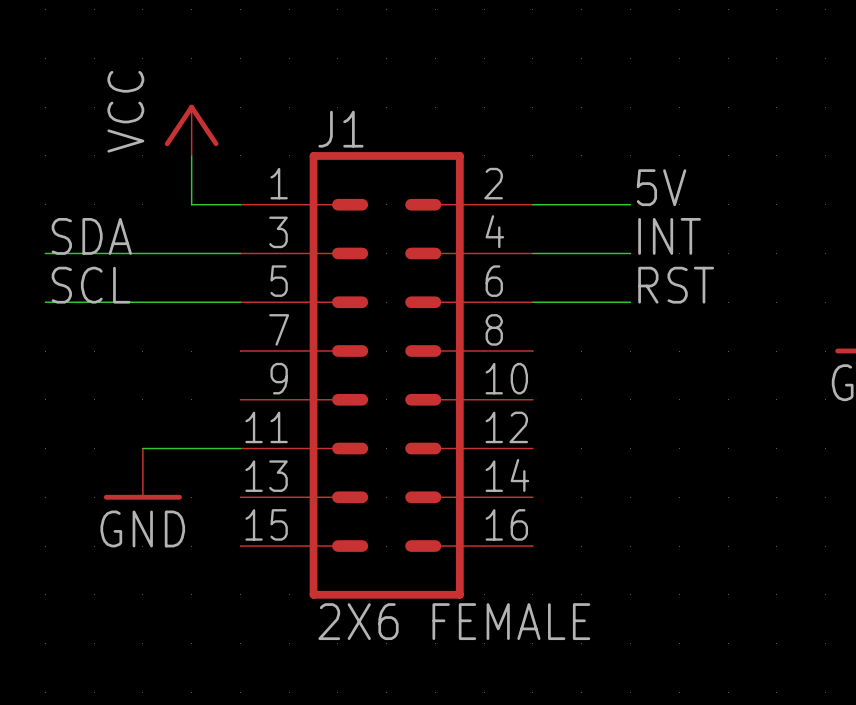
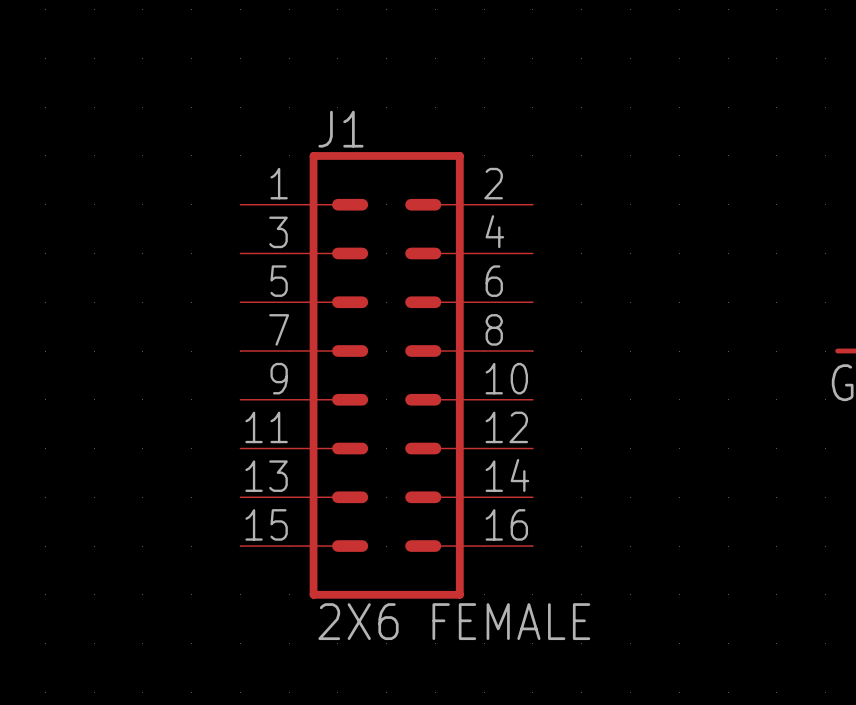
power symbol: VCC (191, 130) -> none
wire: (191, 155) (191, 204) (240, 204) -> none
label: 5V (661, 187) -> none
wire: (532, 204) (630, 204) -> none
label: SDA (91, 236) -> none
label: INT (669, 236) -> none
wire: (45, 253) (240, 253) -> none
wire: (532, 253) (630, 253) -> none
label: SCL (91, 285) -> none
label: RST (676, 285) -> none
wire: (45, 302) (240, 302) -> none
wire: (532, 302) (630, 302) -> none
wire: (142, 448) (240, 448) -> none
power symbol: GND (142, 474) -> none

